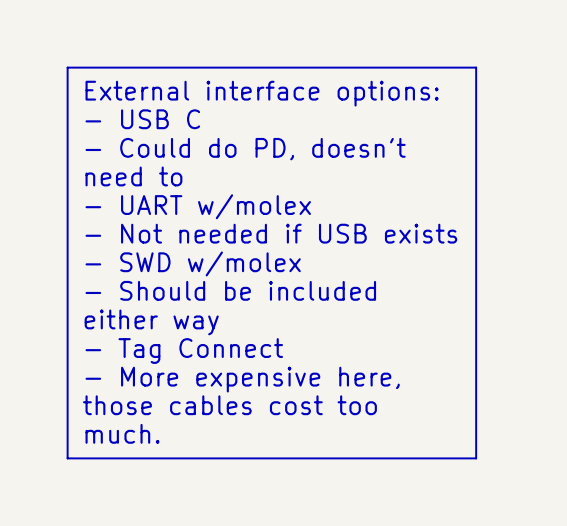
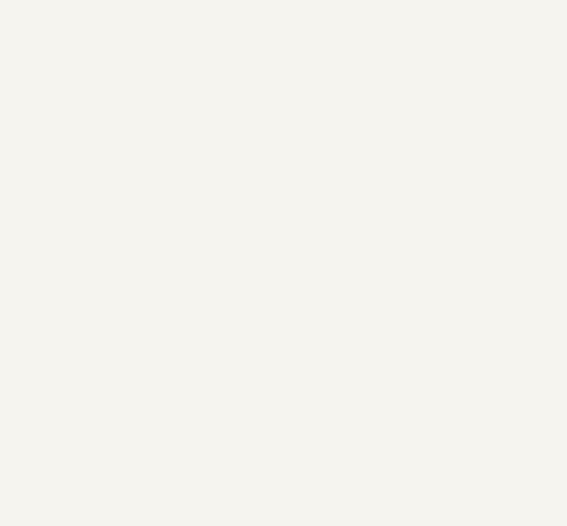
line: (67, 67) (476, 67) (476, 458) (67, 458) (67, 67) -> none
text: External interface options: (262, 93) -> none
text: - USB C (142, 119) -> none
text: - Could do PD, doesn't (245, 149) -> none
text: need to (133, 176) -> none
text: - UART w/molex (198, 206) -> none
text: - Not needed if USB exists (271, 233) -> none
text: - SWD w/molex (193, 263) -> none
text: - Should be included (230, 290) -> none
text: either way (151, 322) -> none
text: - Tag Connect (184, 351) -> none
text: - More expensive here, (242, 379) -> none
text: those cables cost too (229, 405) -> none
text: much. (122, 433) -> none

